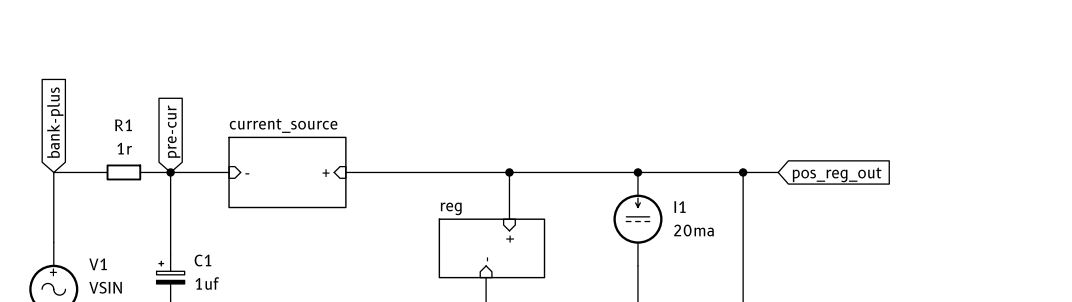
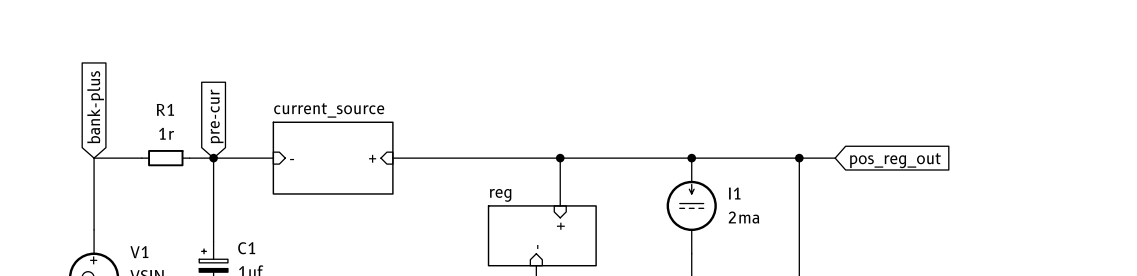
I1 value: 20ma (694, 230) -> 2ma (743, 217)

